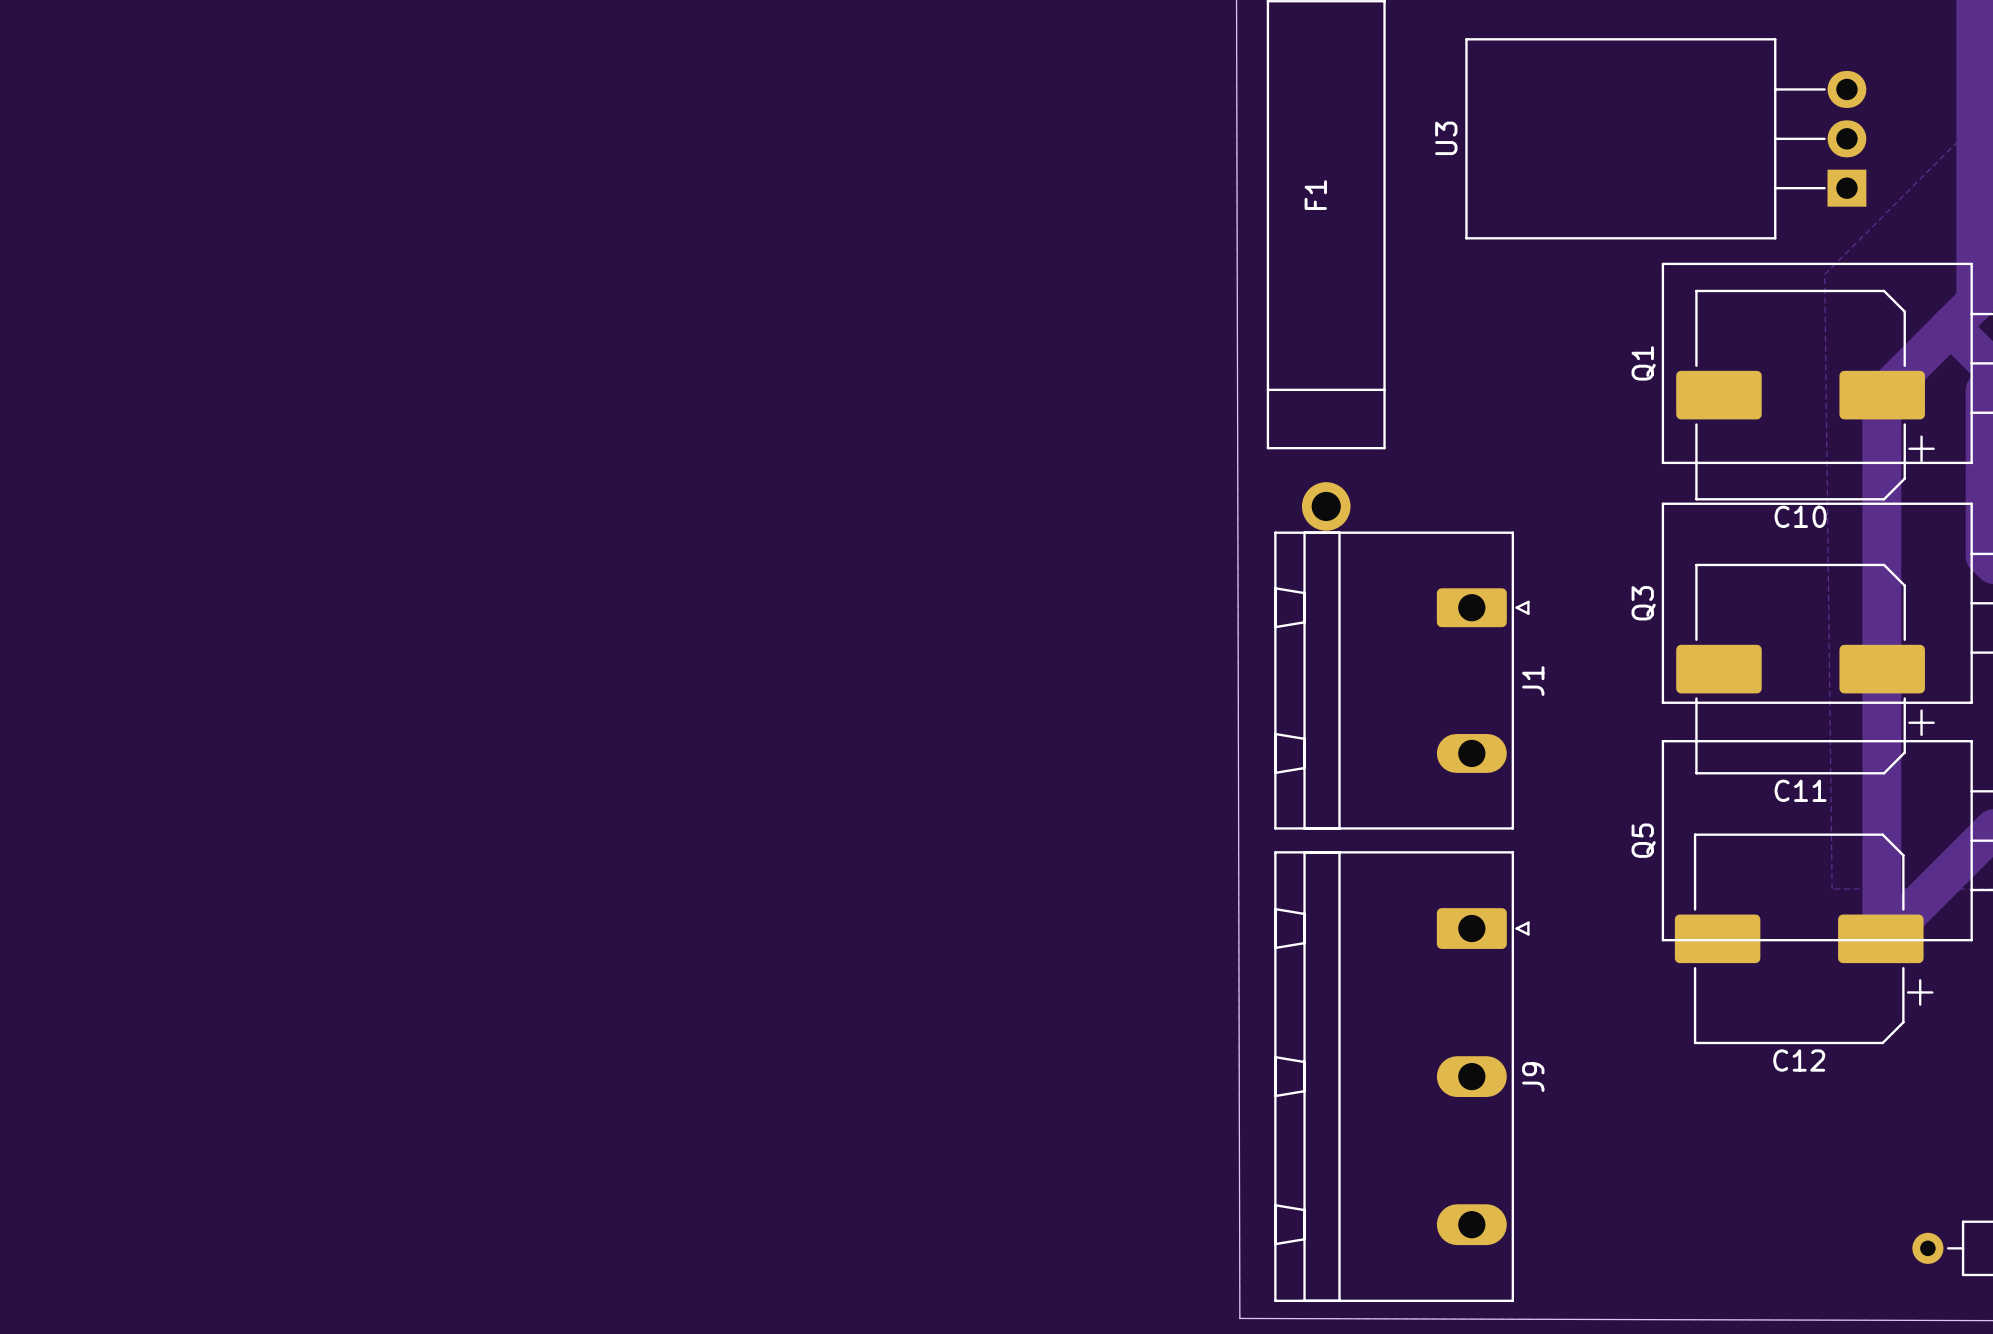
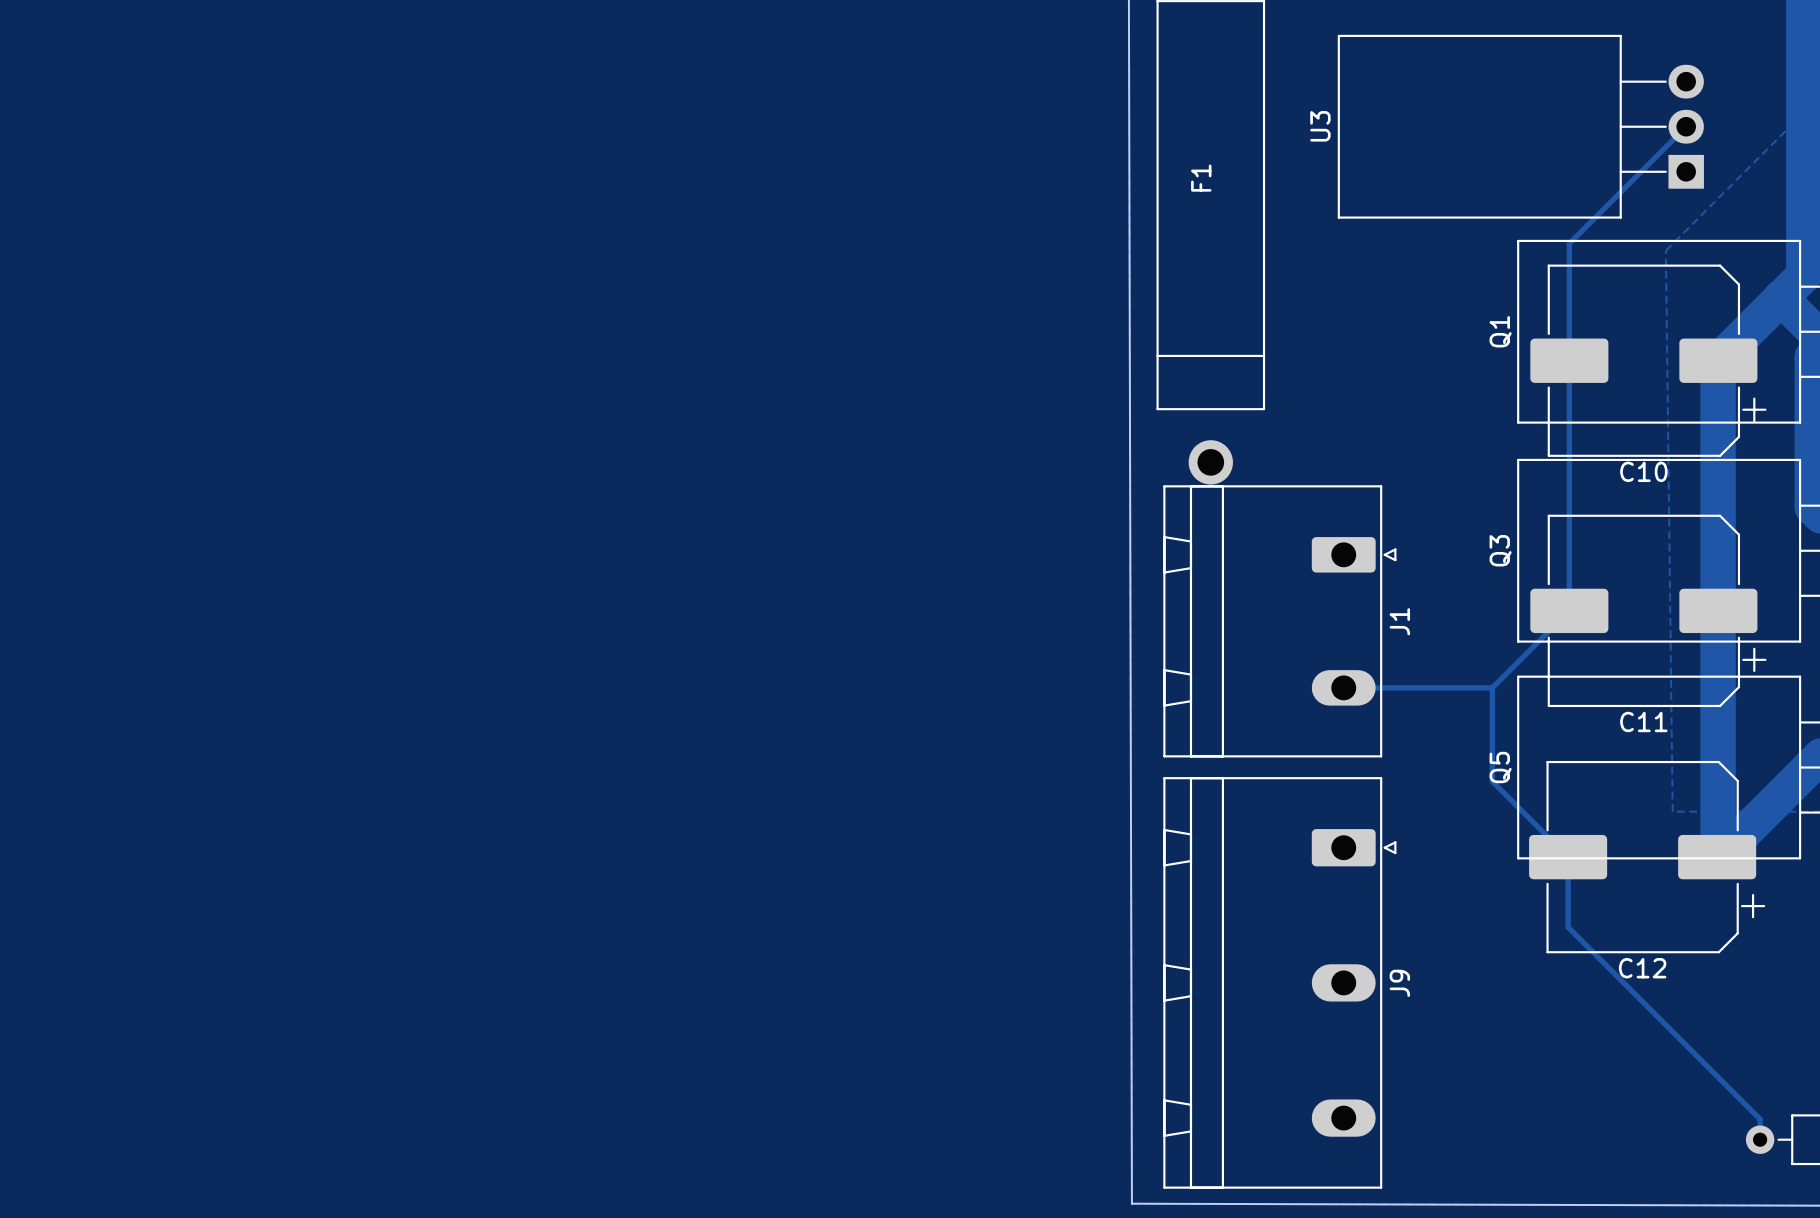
track: none -> (1686, 126) (1569, 243) (1569, 610) (1492, 687)
track: none -> (1343, 687) (1492, 687)
track: none -> (1492, 687) (1492, 781) (1568, 857) (1568, 927) (1760, 1119) (1760, 1139)

